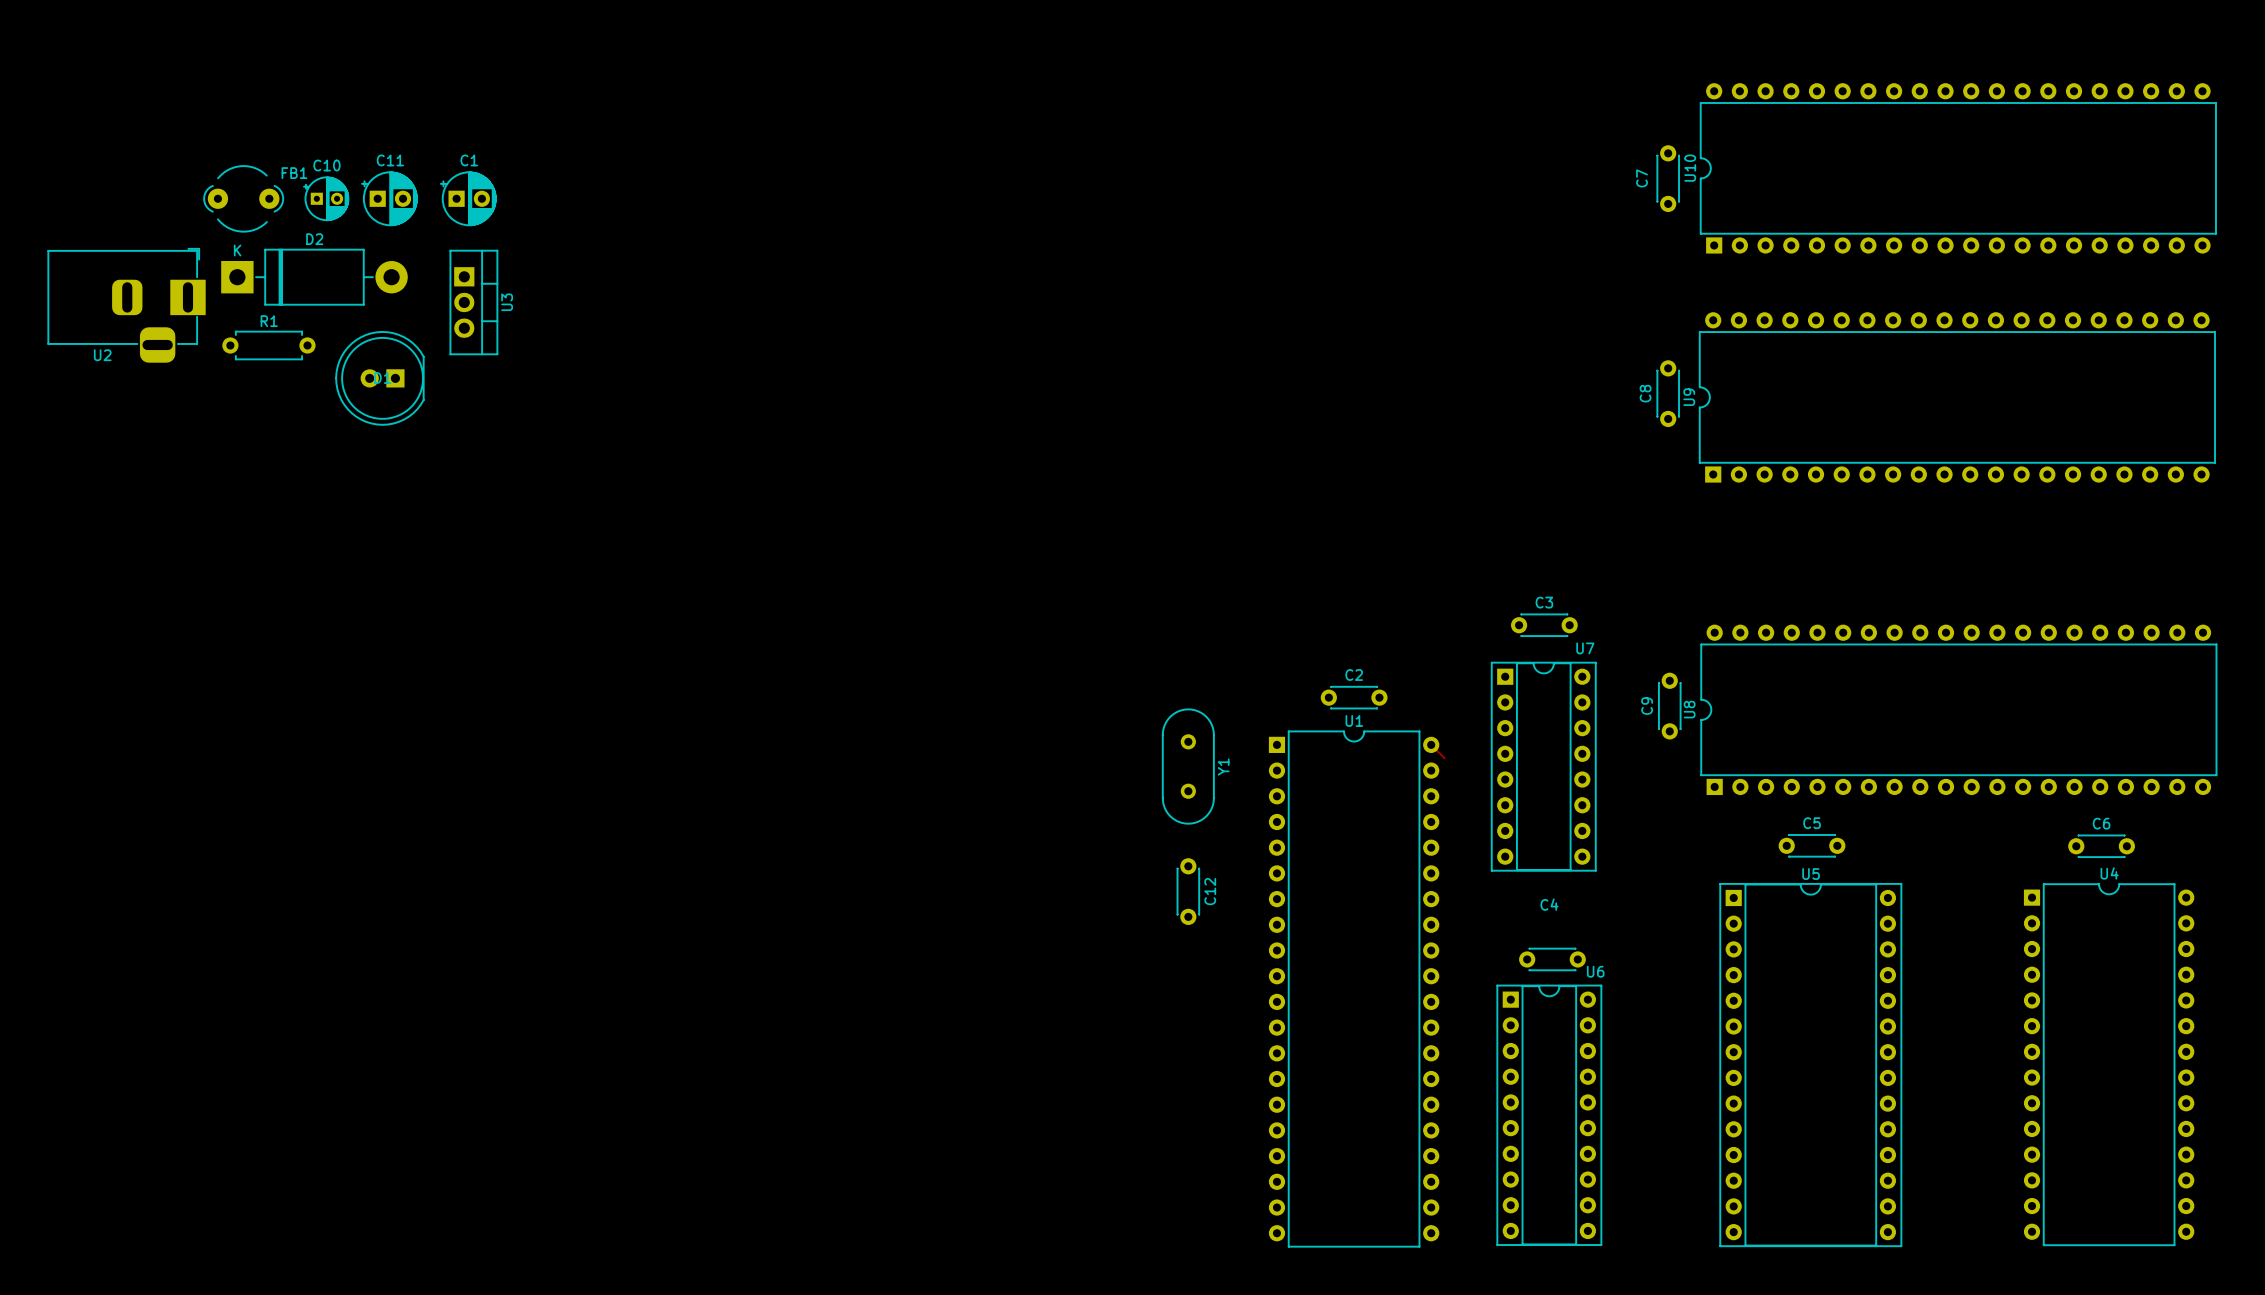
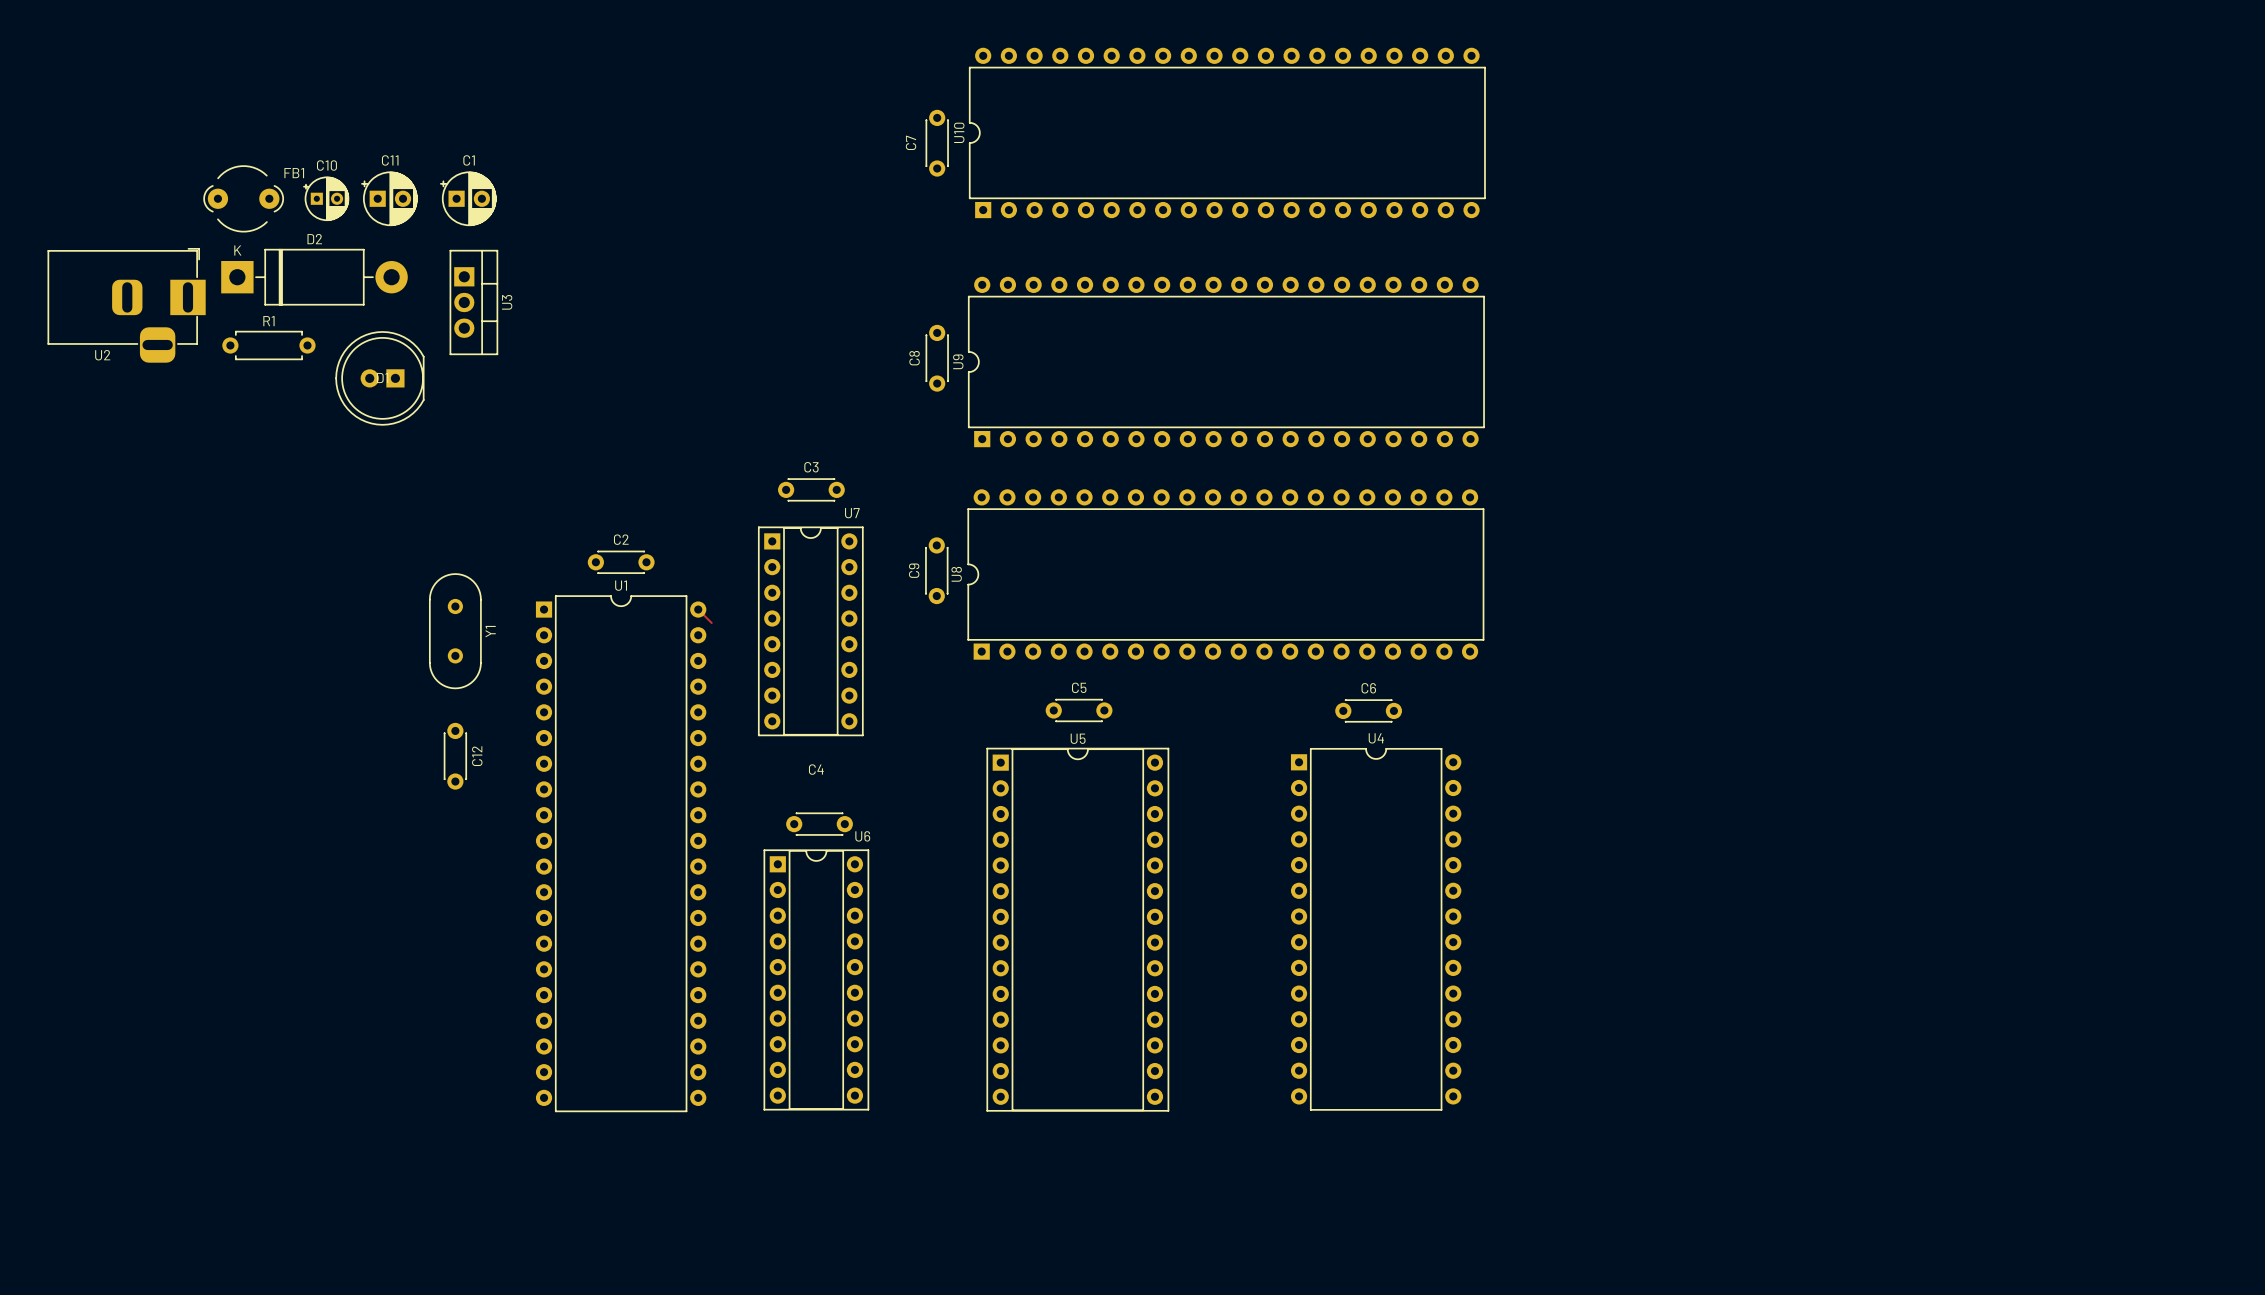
U10 position: (1958, 168) -> (1227, 132)
C7 position: (1668, 178) -> (937, 143)
C8 position: (1668, 393) -> (937, 358)
U9 position: (1957, 397) -> (1226, 361)
top track: none -> (698, 609) (711, 623)
C3 position: (1544, 625) -> (811, 489)
C2 position: (1354, 697) -> (621, 562)
C9 position: (1669, 706) -> (936, 570)
U8 position: (1958, 709) -> (1225, 574)
top track: (1431, 744) (1444, 758) -> none
Y1 position: (1188, 766) -> (455, 631)
U7 position: (1543, 766) -> (810, 631)
C5 position: (1812, 845) -> (1079, 710)
C6 position: (2101, 846) -> (1368, 710)
C12 position: (1188, 891) -> (455, 756)
C4 position: (1552, 959) -> (819, 824)
U1 position: (1354, 989) -> (621, 853)
U4 position: (2109, 1064) -> (1376, 929)
U5 position: (1810, 1065) -> (1077, 929)
U6 position: (1549, 1115) -> (816, 979)

